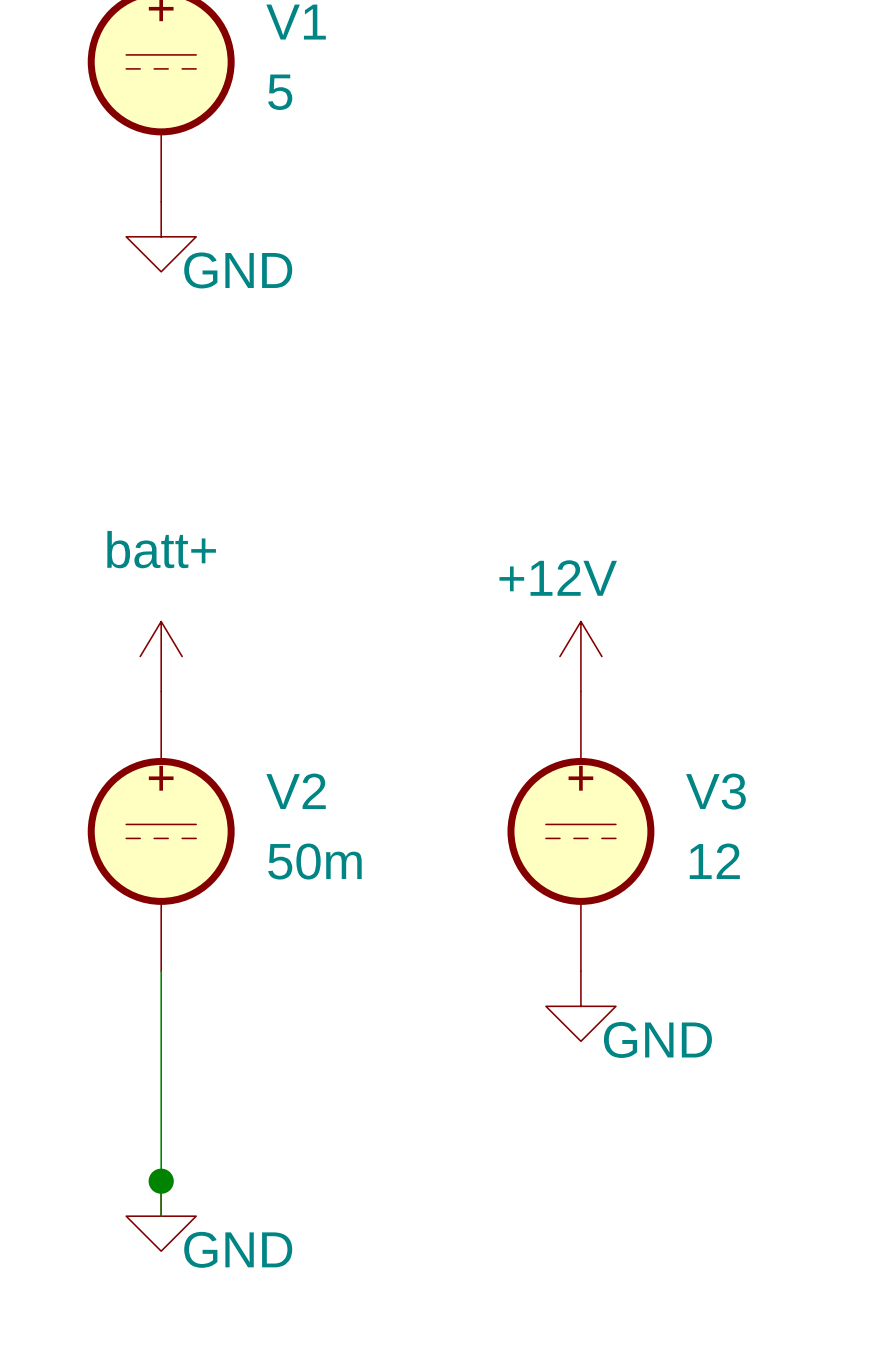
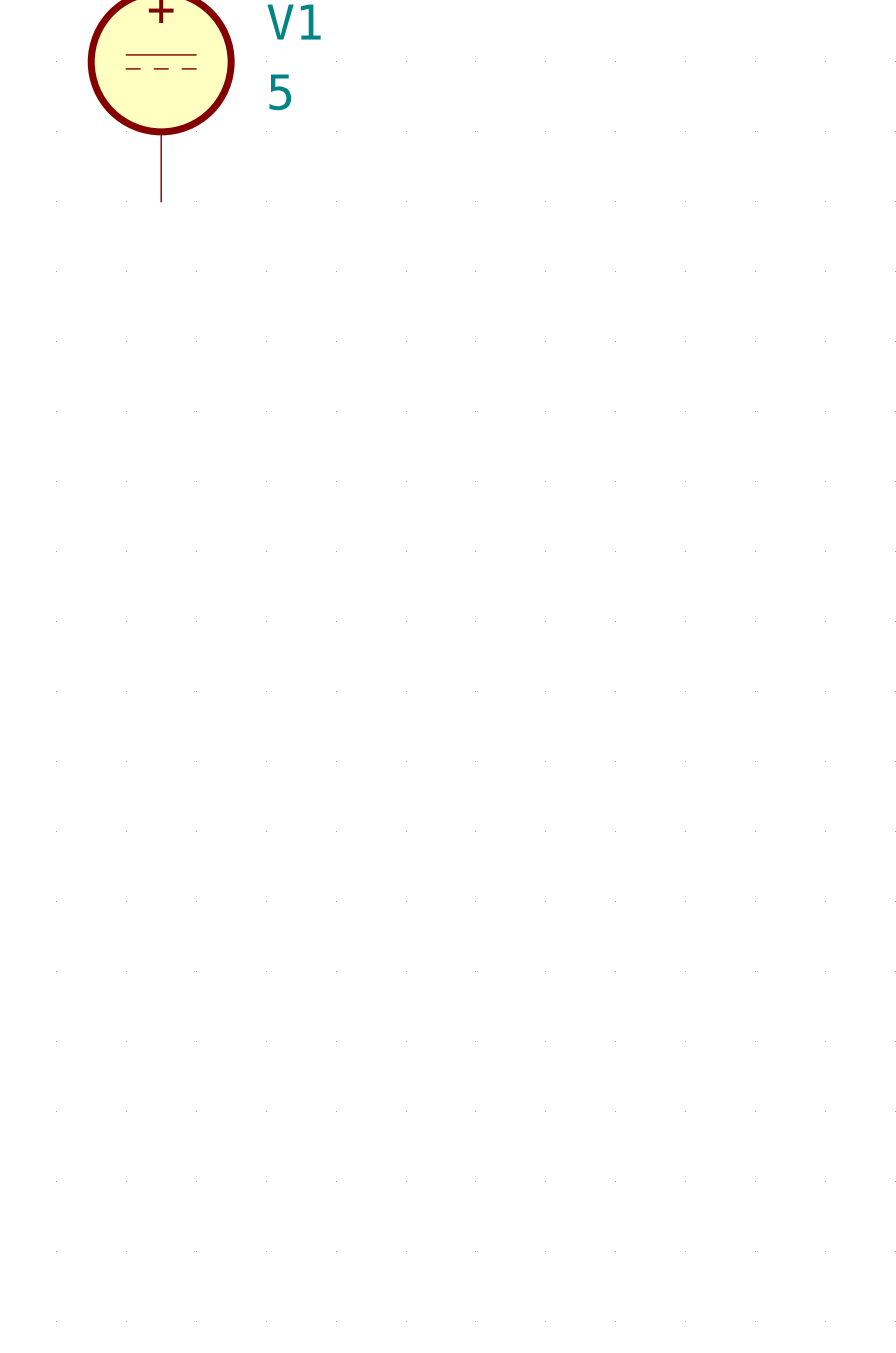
power symbol: GND (161, 236) -> none
power symbol: batt+ (161, 656) -> none
power symbol: +12V (580, 656) -> none
V2: 50m (161, 831) -> none
V3: 12 (580, 831) -> none
wire: (161, 971) (161, 1216) -> none
power symbol: GND (580, 1006) -> none
junction: (161, 1181) -> none
power symbol: GND (161, 1216) -> none

